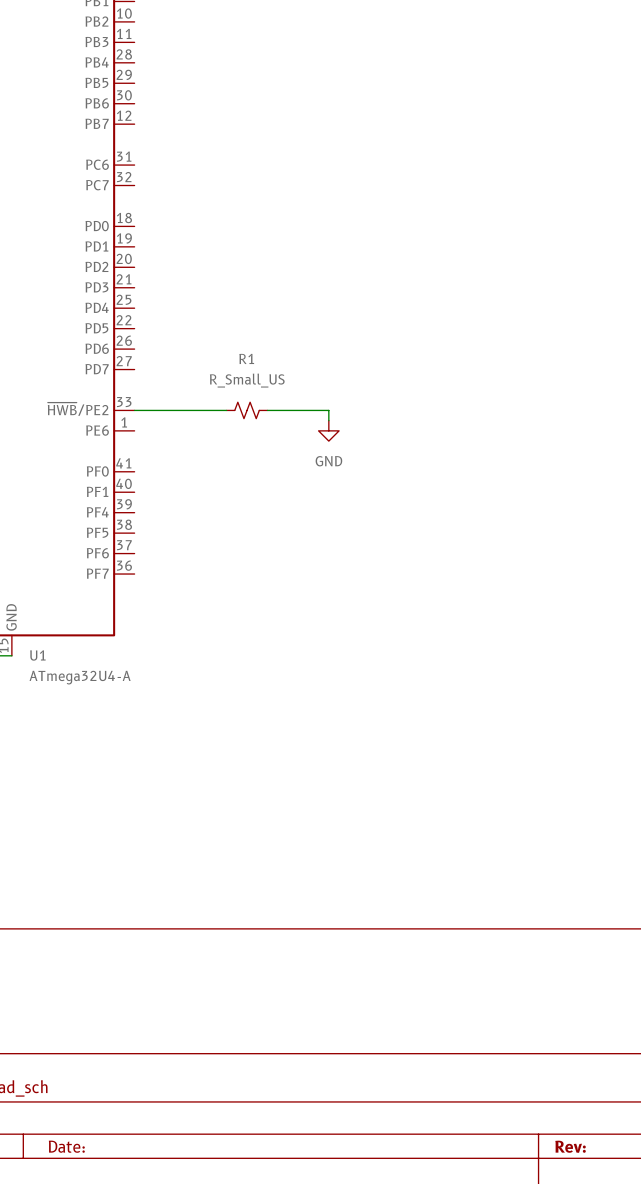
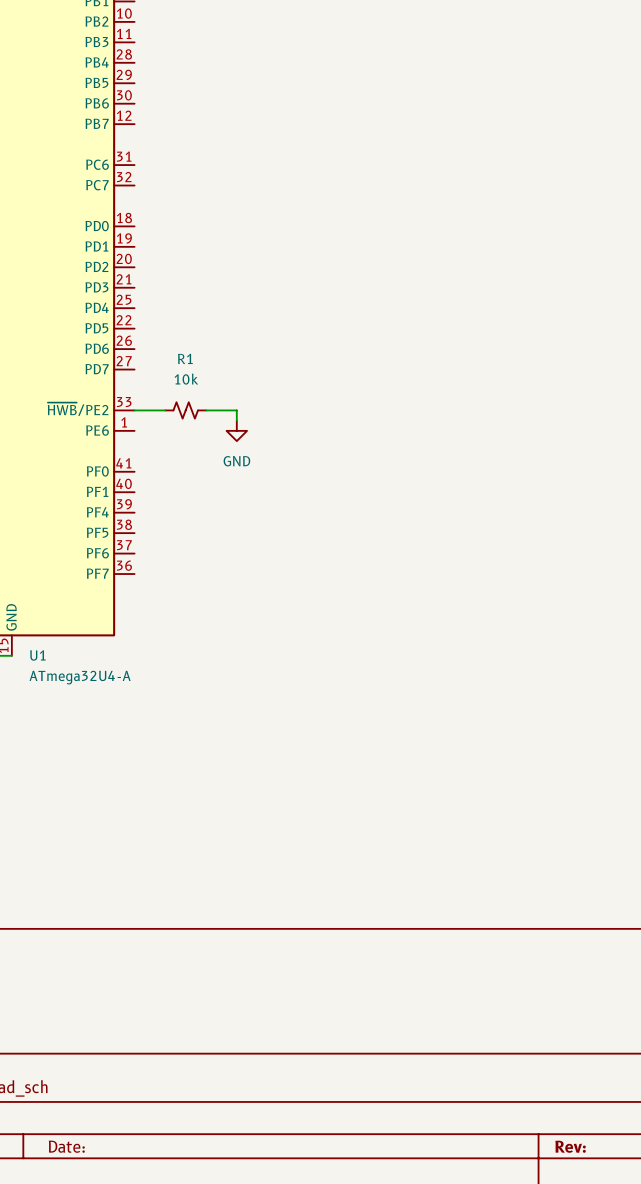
R1 value: R_Small_US (247, 380) -> 10k (186, 379)
wire: none -> (226, 410) (236, 410) (236, 420)
R1 position: (247, 410) -> (185, 410)
wire: (267, 410) (328, 410) (328, 420) -> none
power symbol position: GND (328, 430) -> GND (236, 430)

